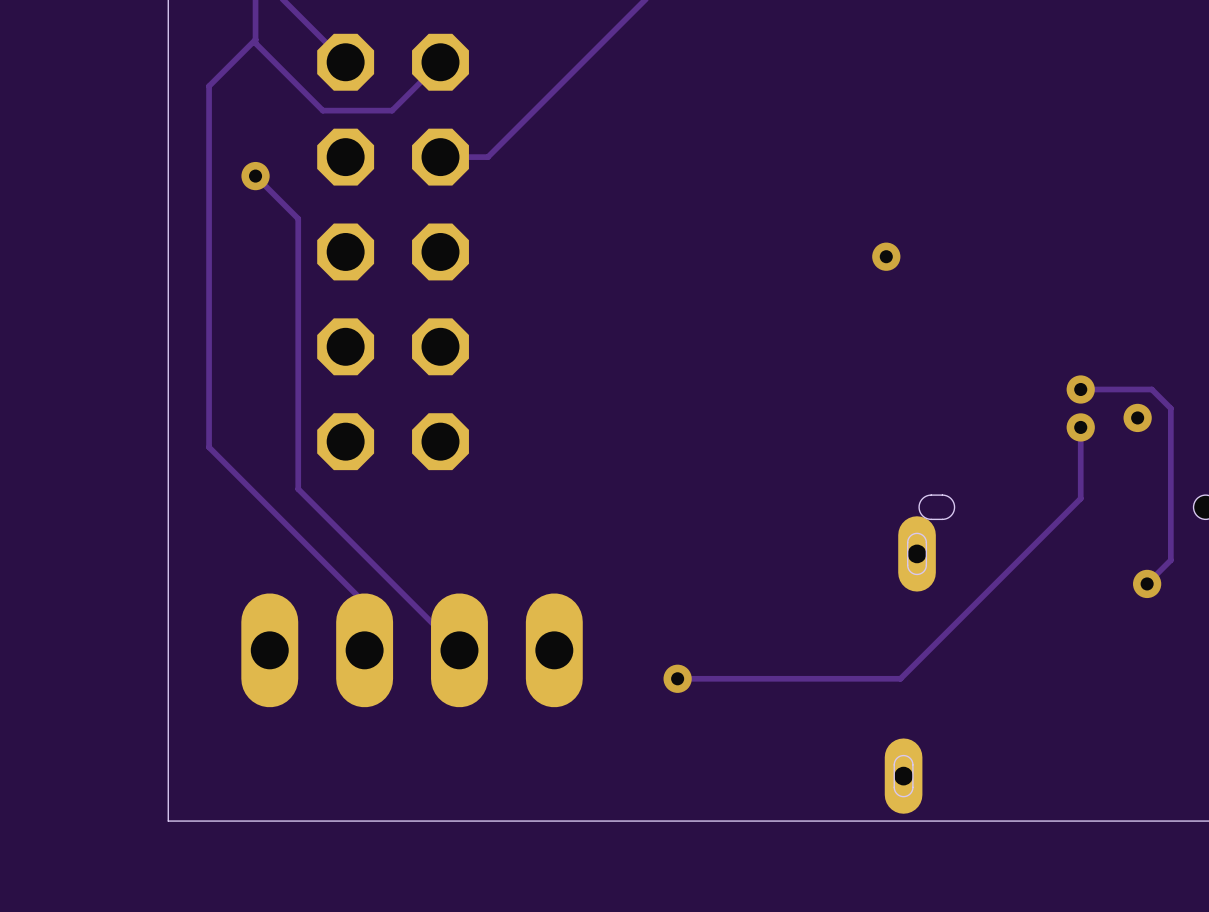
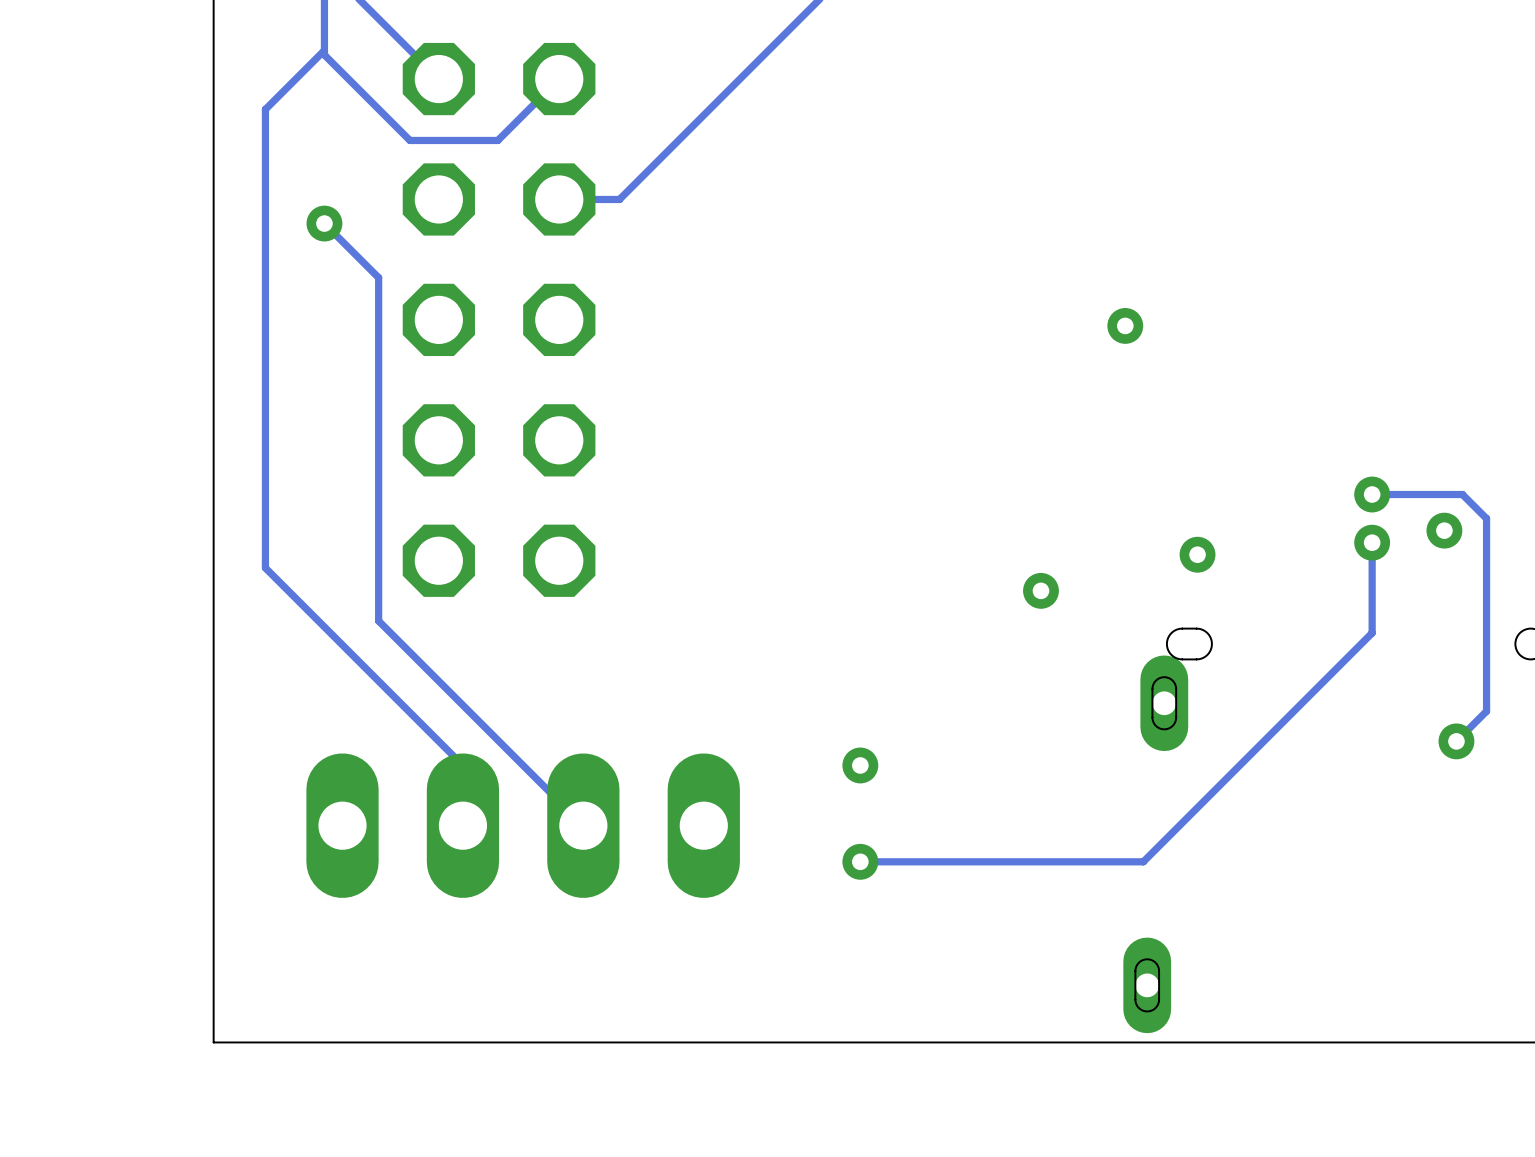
via: none -> (1197, 554)
via: none -> (1040, 590)
via: none -> (860, 765)

